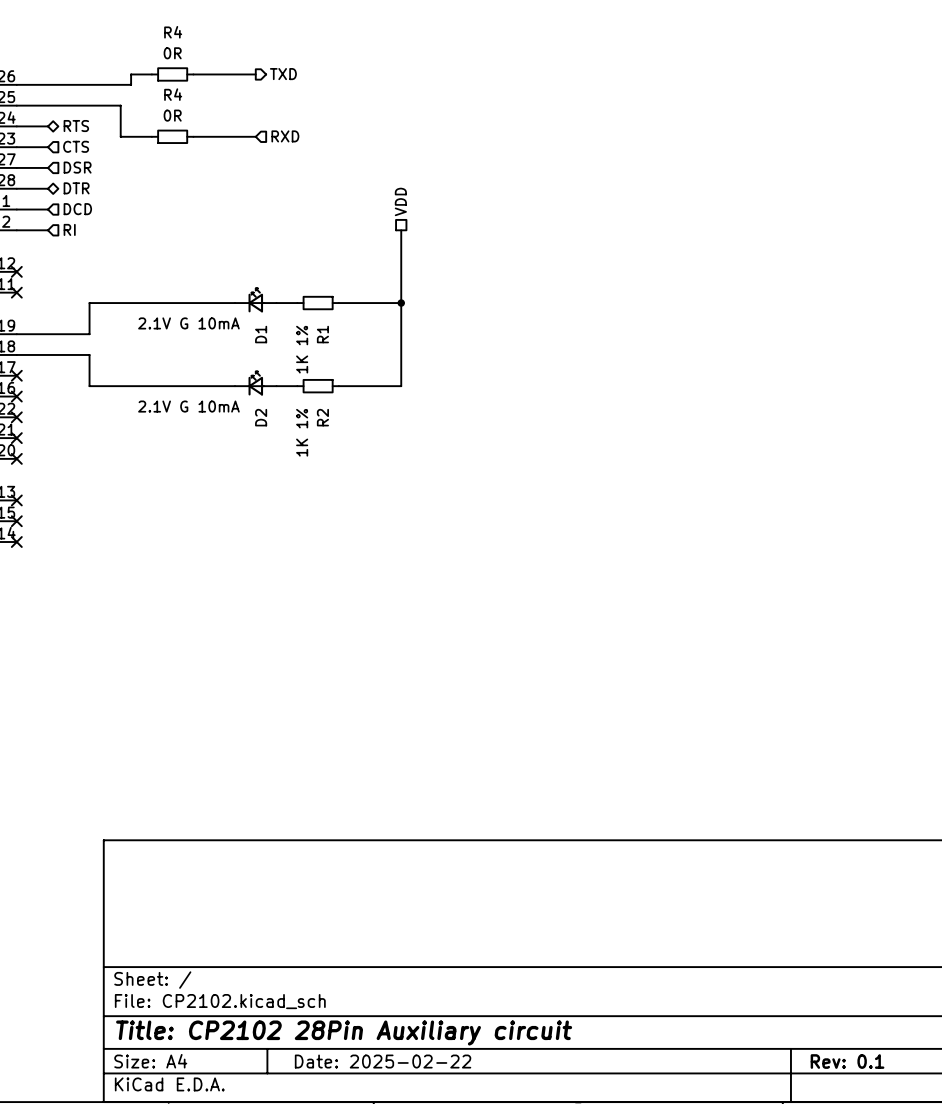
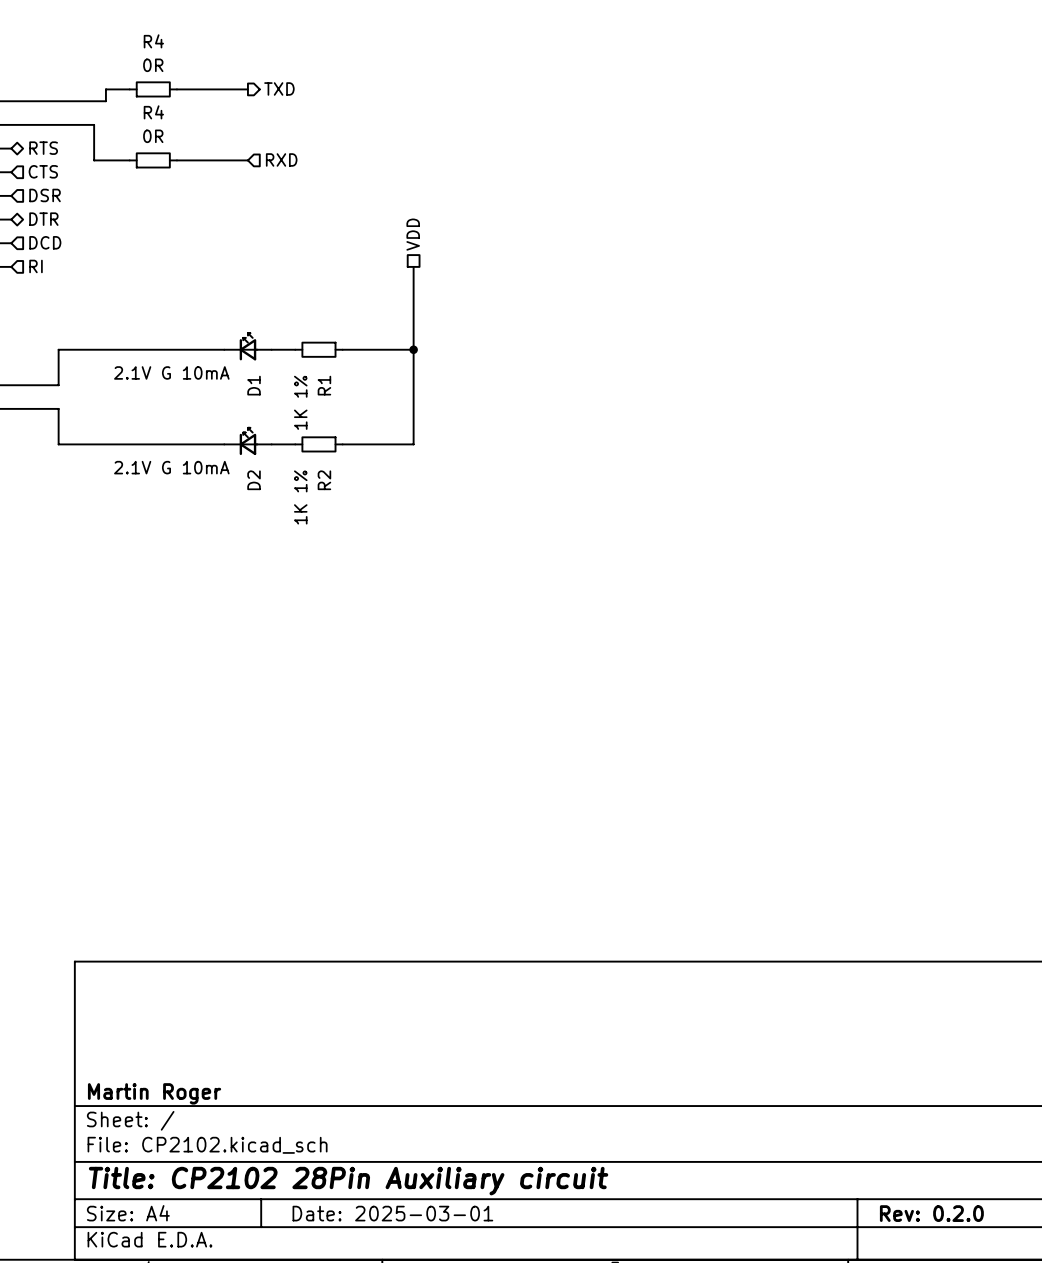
title block: none -> Martin Roger (154, 1093)
title block: Date: 2025-02-22 (383, 1061) -> Date: 2025-03-01 (392, 1213)
title block: Rev: 0.1 (847, 1061) -> Rev: 0.2.0 (931, 1213)

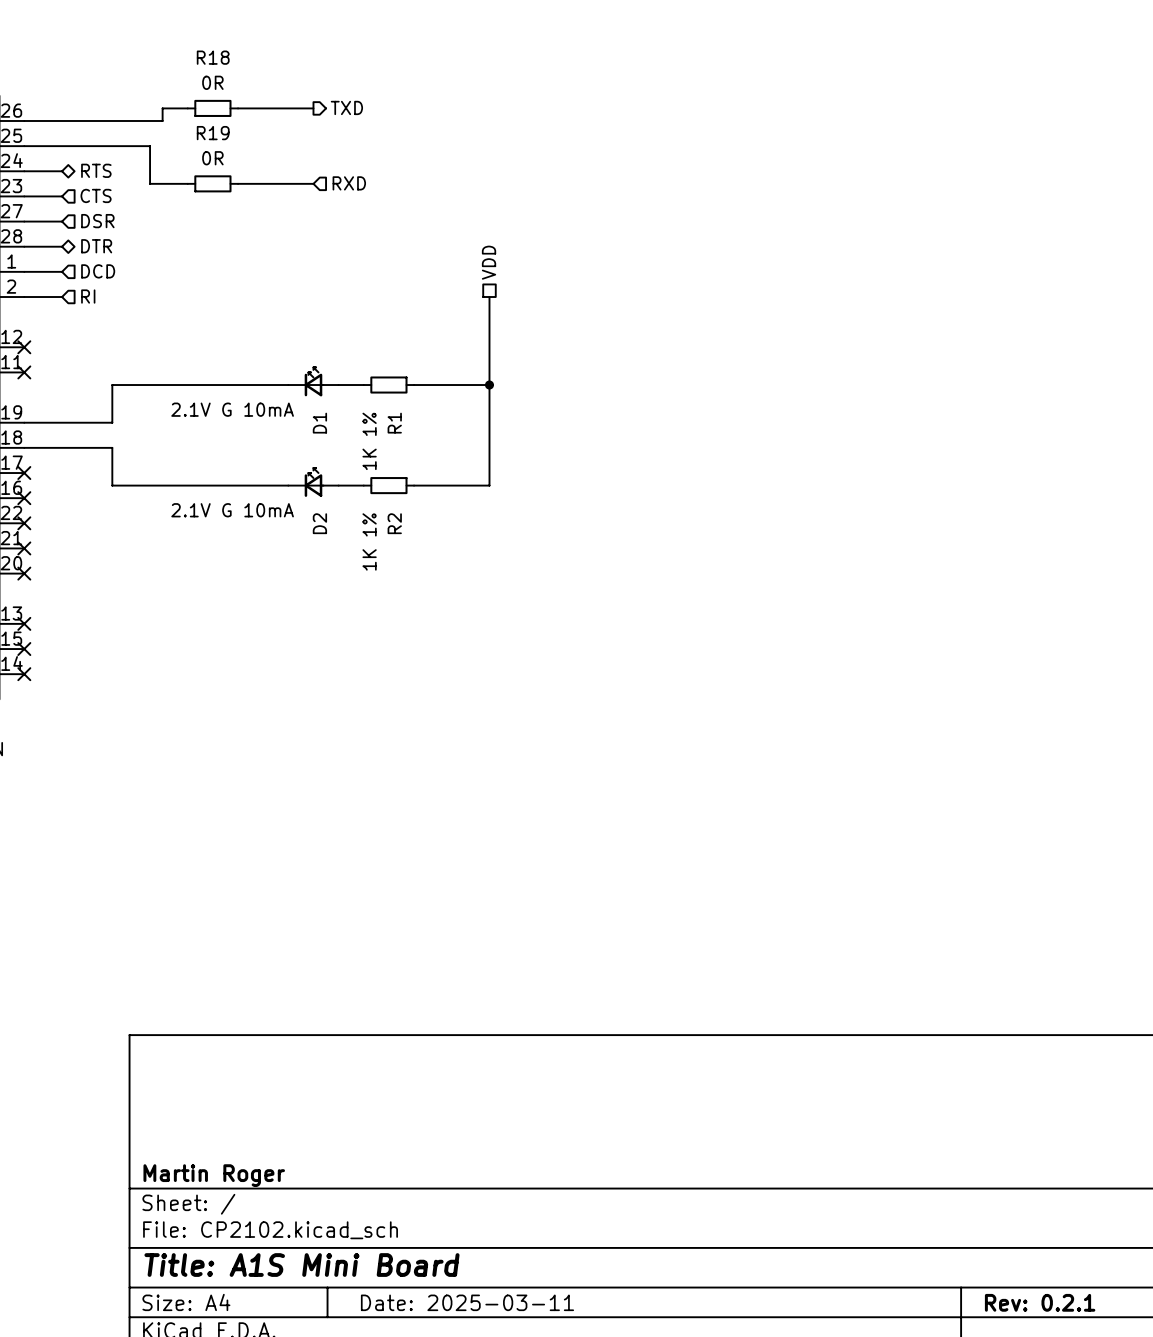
R4 name: R4 (153, 41) -> R18 (213, 57)
R4 name: R4 (153, 112) -> R19 (213, 133)
title block: Title: CP2102 28Pin Auxiliary circuit (348, 1181) -> Title: A1S Mini Board (301, 1265)
title block: Date: 2025-03-01 (392, 1213) -> Date: 2025-03-11 (467, 1302)
title block: Rev: 0.2.0 (931, 1213) -> Rev: 0.2.1 (1040, 1302)

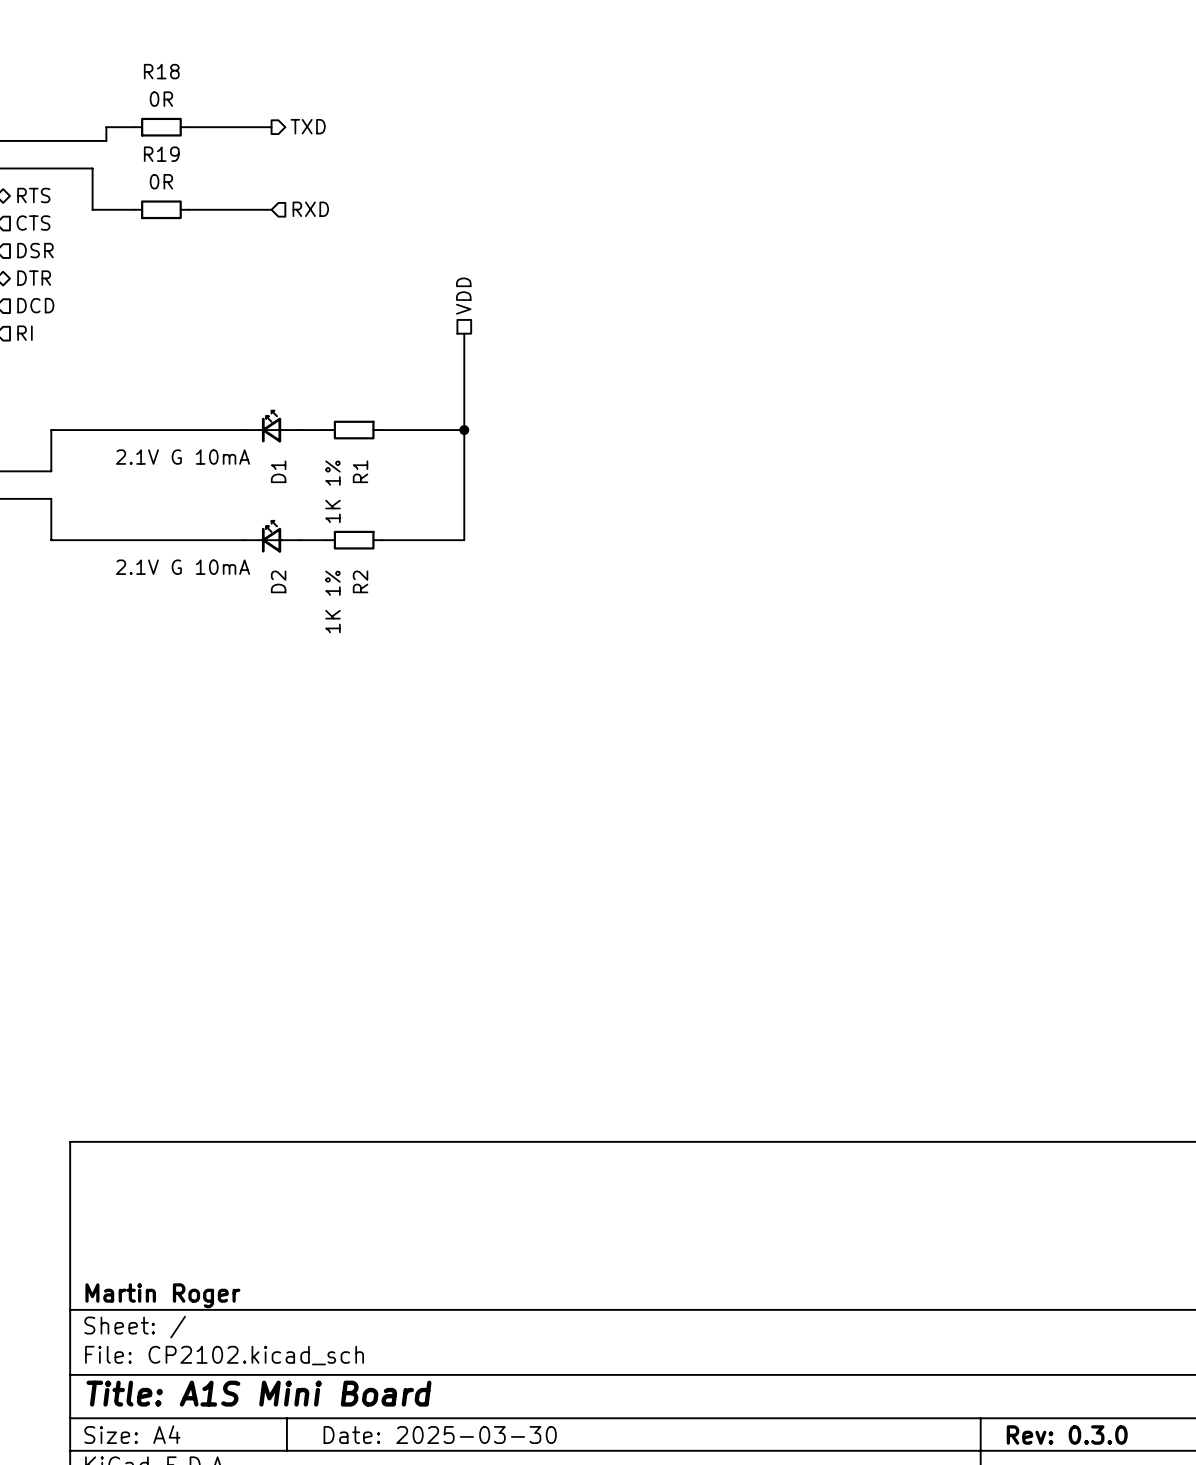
title block: Date: 2025-03-11 (467, 1302) -> Date: 2025-03-30 (440, 1435)
title block: Rev: 0.2.1 (1040, 1302) -> Rev: 0.3.0 (1067, 1435)

